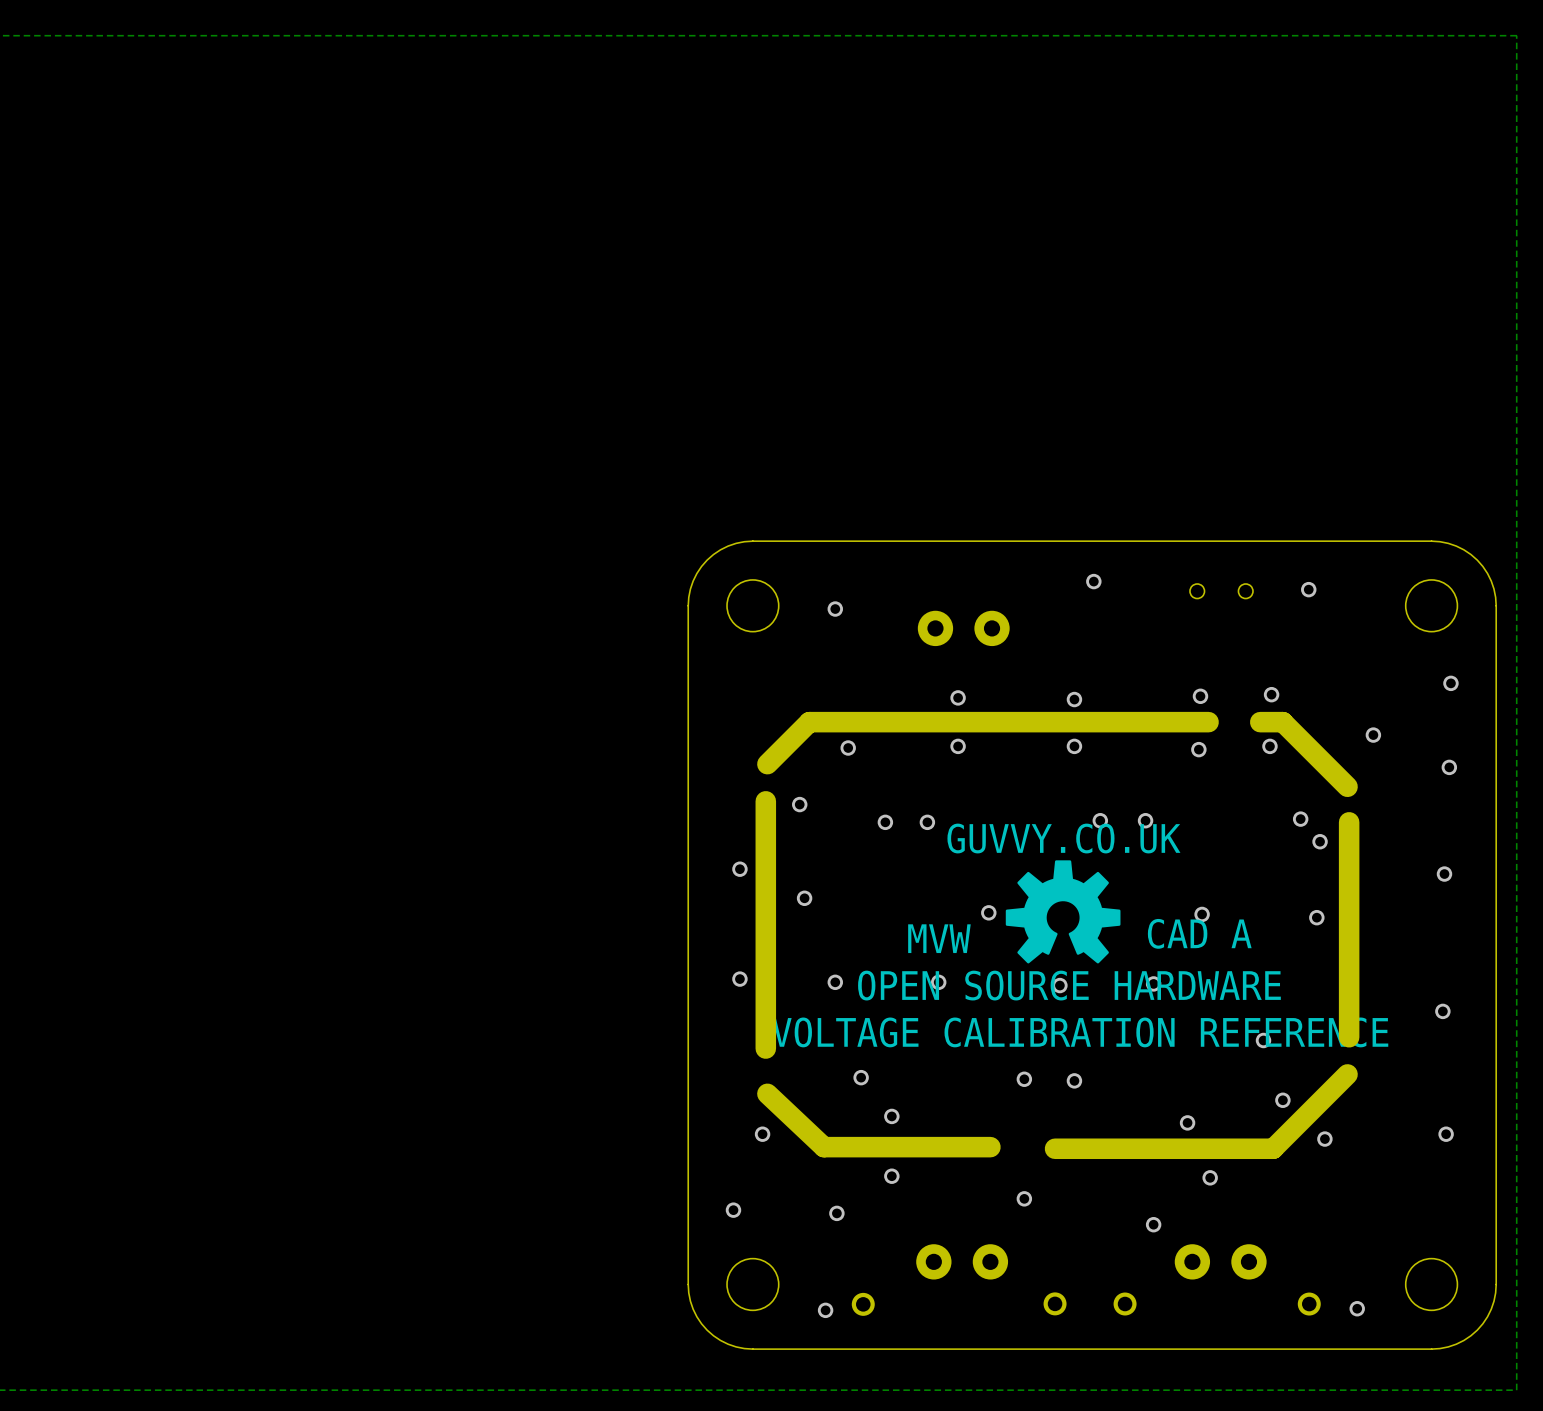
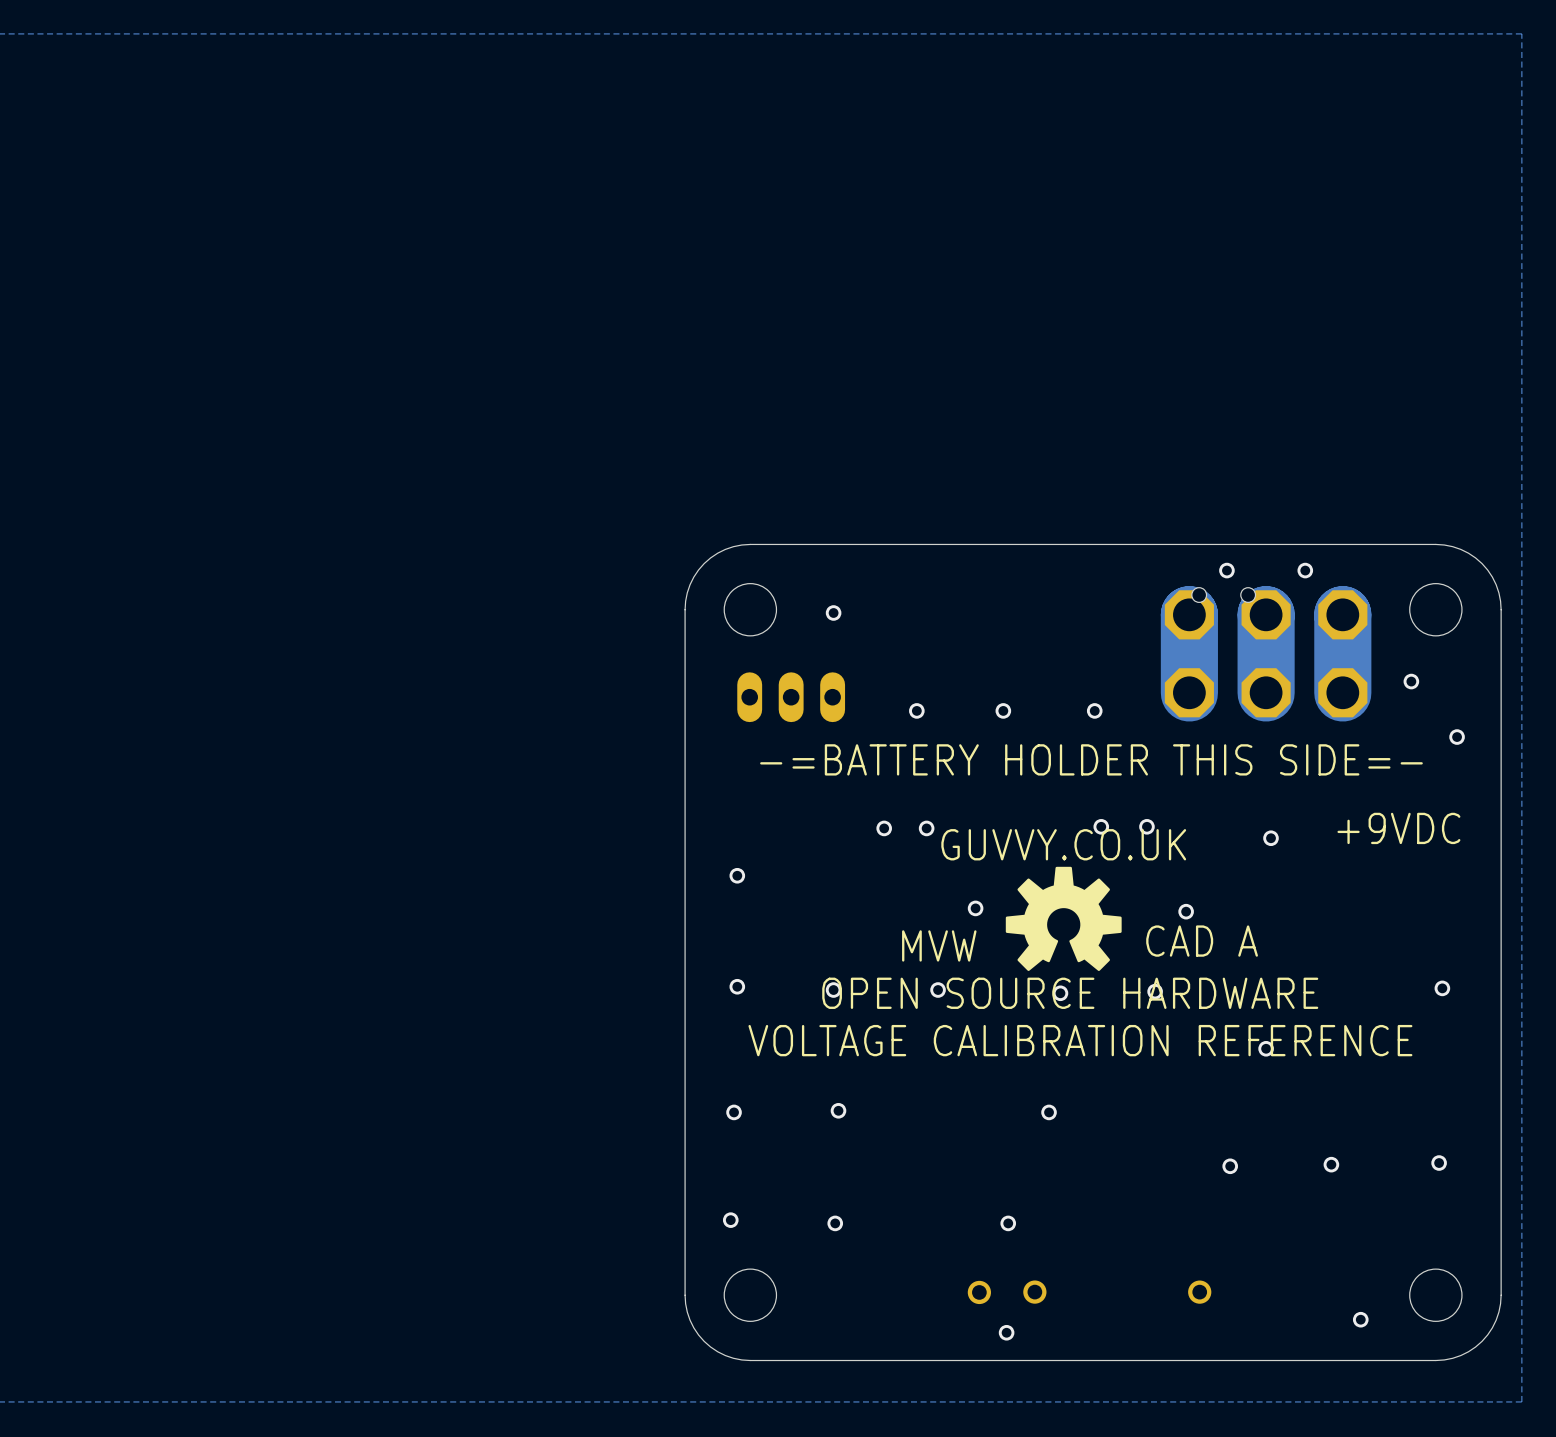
via: none -> (1226, 570)
via: (1093, 581) -> none
via position: (1308, 589) -> (1305, 570)
track: none -> (1189, 614) (1189, 692)
track: none -> (1266, 614) (1266, 692)
track: none -> (1342, 614) (1342, 692)
part: (963, 628) -> none
part: none -> (1266, 653)
via: none -> (1411, 681)
via: (1450, 683) -> none
part: none -> (791, 697)
via: (1271, 694) -> none
via: (1200, 696) -> none
via: (958, 697) -> none
via position: (1074, 699) -> (1094, 710)
via: none -> (916, 710)
via: none -> (1003, 710)
board edge: (1208, 722) (809, 722) (767, 764) -> none
board edge: (1260, 722) (1282, 722) (1347, 786) -> none
via: none -> (1457, 737)
via: (1373, 735) -> none
via: (958, 746) -> none
via: (1074, 746) -> none
via: (1269, 746) -> none
via: (848, 748) -> none
via: (1198, 749) -> none
text: none -> -=BATTERY HOLDER THIS SIDE=- (1091, 759)
via: (1449, 767) -> none
board edge: (765, 801) (765, 1048) -> none
via: (799, 804) -> none
via: (1300, 819) -> none
board edge: (1349, 822) (1349, 1037) -> none
text: none -> +9VDC (1398, 828)
via: none -> (1271, 838)
via: (1320, 841) -> none
via: (1444, 874) -> none
via: (804, 898) -> none
via position: (988, 912) -> (975, 908)
via position: (1202, 914) -> (1186, 911)
via: (1316, 917) -> none
via position: (1442, 1011) -> (1442, 988)
board edge: (1347, 1074) (1273, 1148) (1055, 1148) -> none
via: (861, 1077) -> none
via: (1024, 1079) -> none
via: (1074, 1080) -> none
board edge: (767, 1093) (823, 1147) (990, 1147) -> none
via: (1282, 1100) -> none
via: none -> (838, 1110)
via: none -> (1049, 1112)
via: (891, 1116) -> none
via: (1187, 1122) -> none
via position: (762, 1134) -> (734, 1112)
via position: (1446, 1134) -> (1439, 1163)
via position: (1324, 1139) -> (1331, 1164)
via: none -> (1230, 1166)
via: (891, 1176) -> none
via: (1210, 1177) -> none
via position: (1024, 1198) -> (1008, 1223)
via: (1153, 1224) -> none
part: (962, 1261) -> none
part: (1220, 1261) -> none
part: none -> (979, 1292)
part: none -> (1199, 1292)
part position: (1055, 1303) -> (1034, 1292)
part: (863, 1304) -> none
part: (1125, 1304) -> none
part: (1309, 1304) -> none
via: (825, 1310) -> none
via: none -> (1006, 1332)

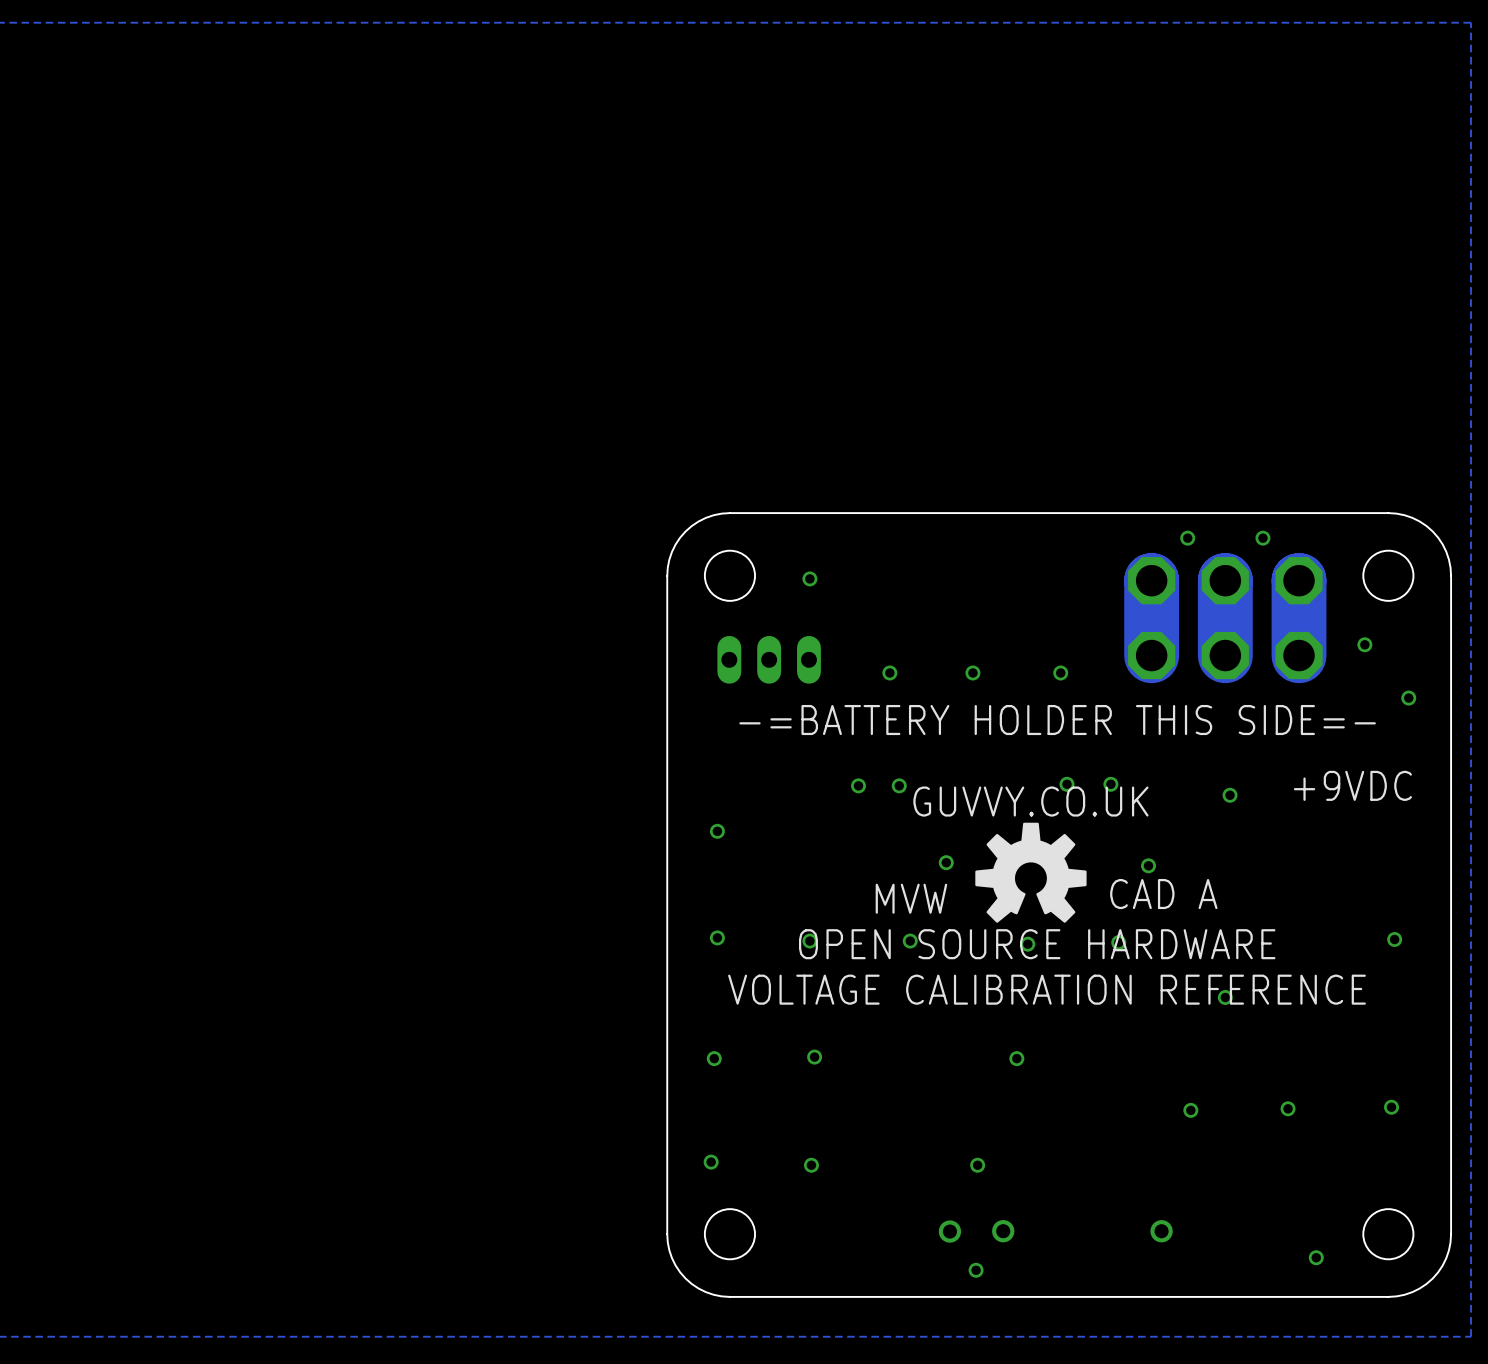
part: (1223, 595) -> none

